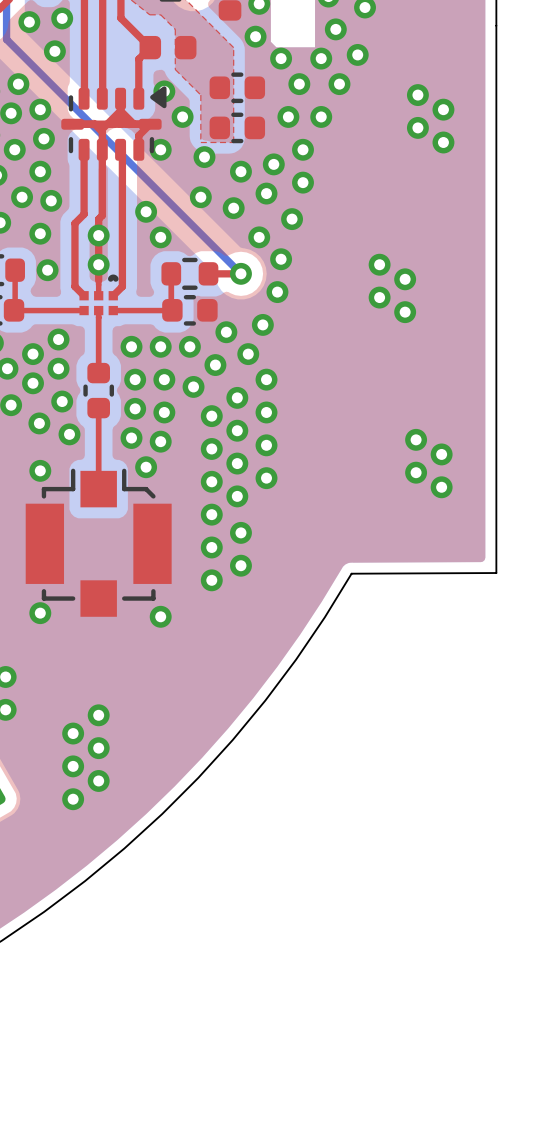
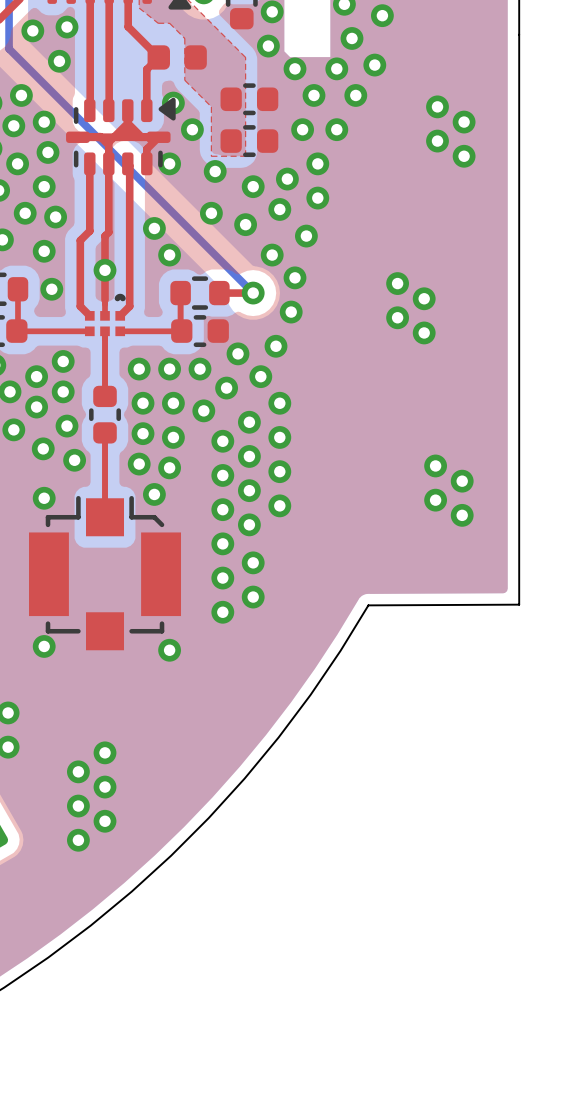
via: (98, 235) -> none
via: none -> (105, 270)
via: (98, 264) -> none

